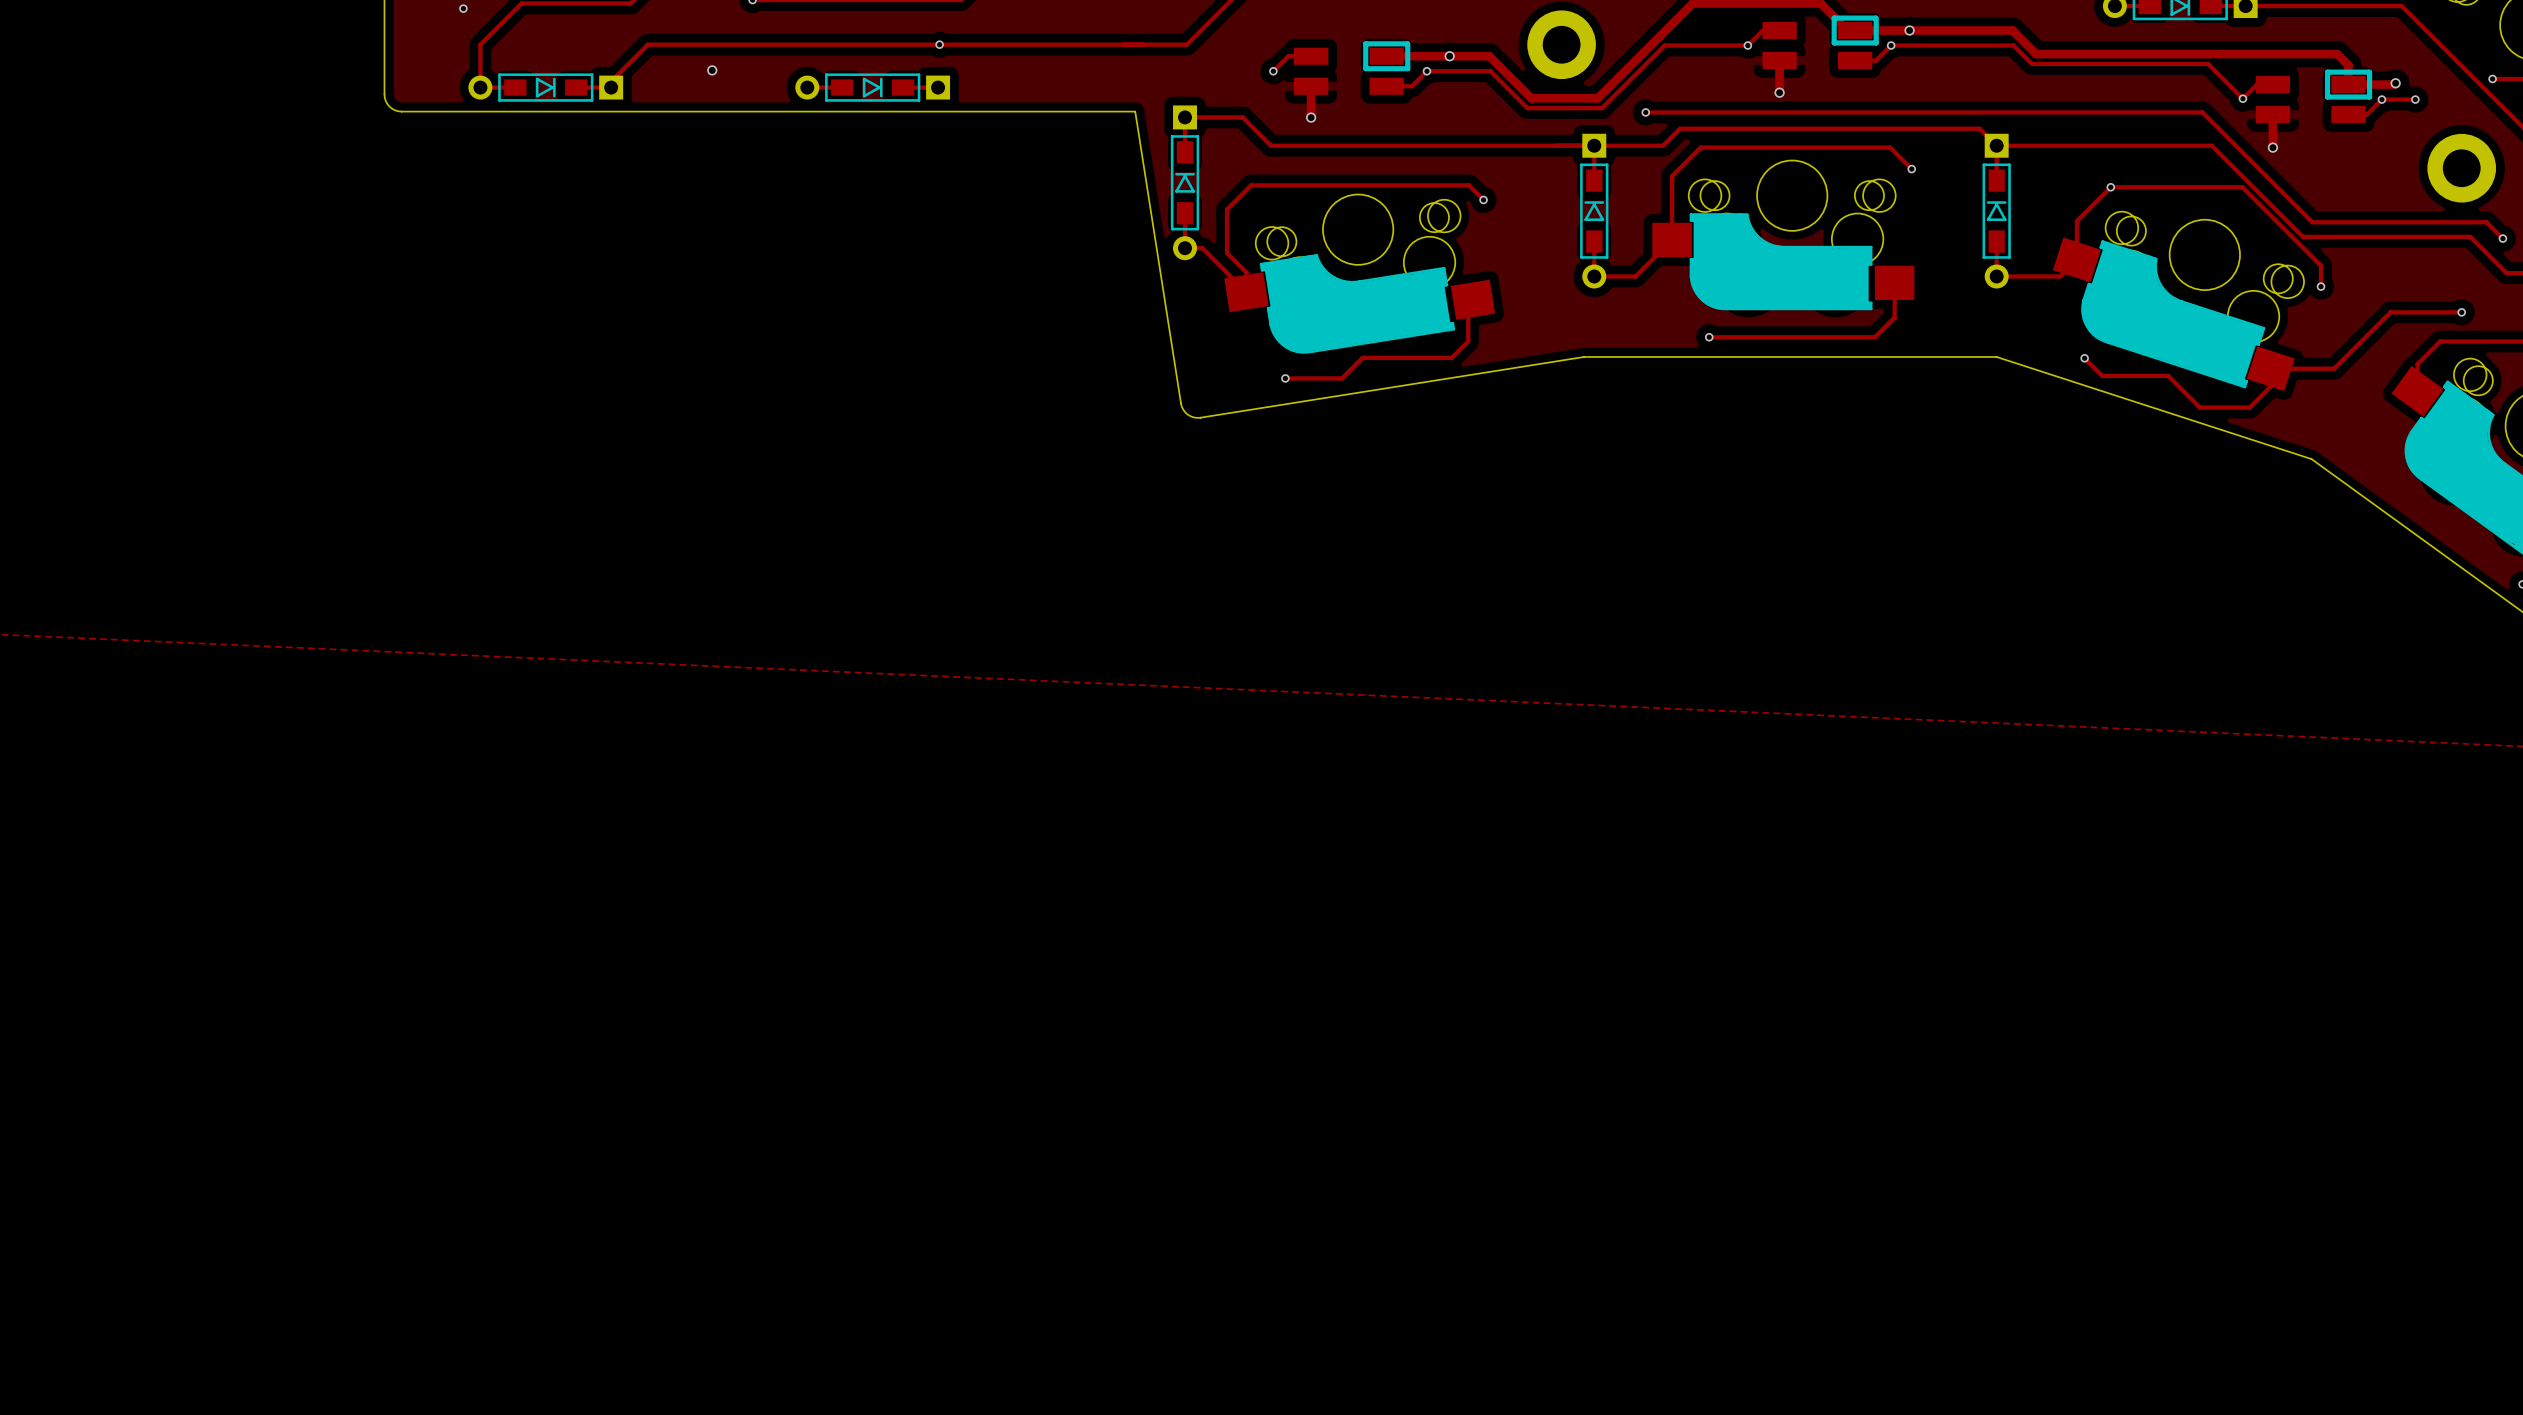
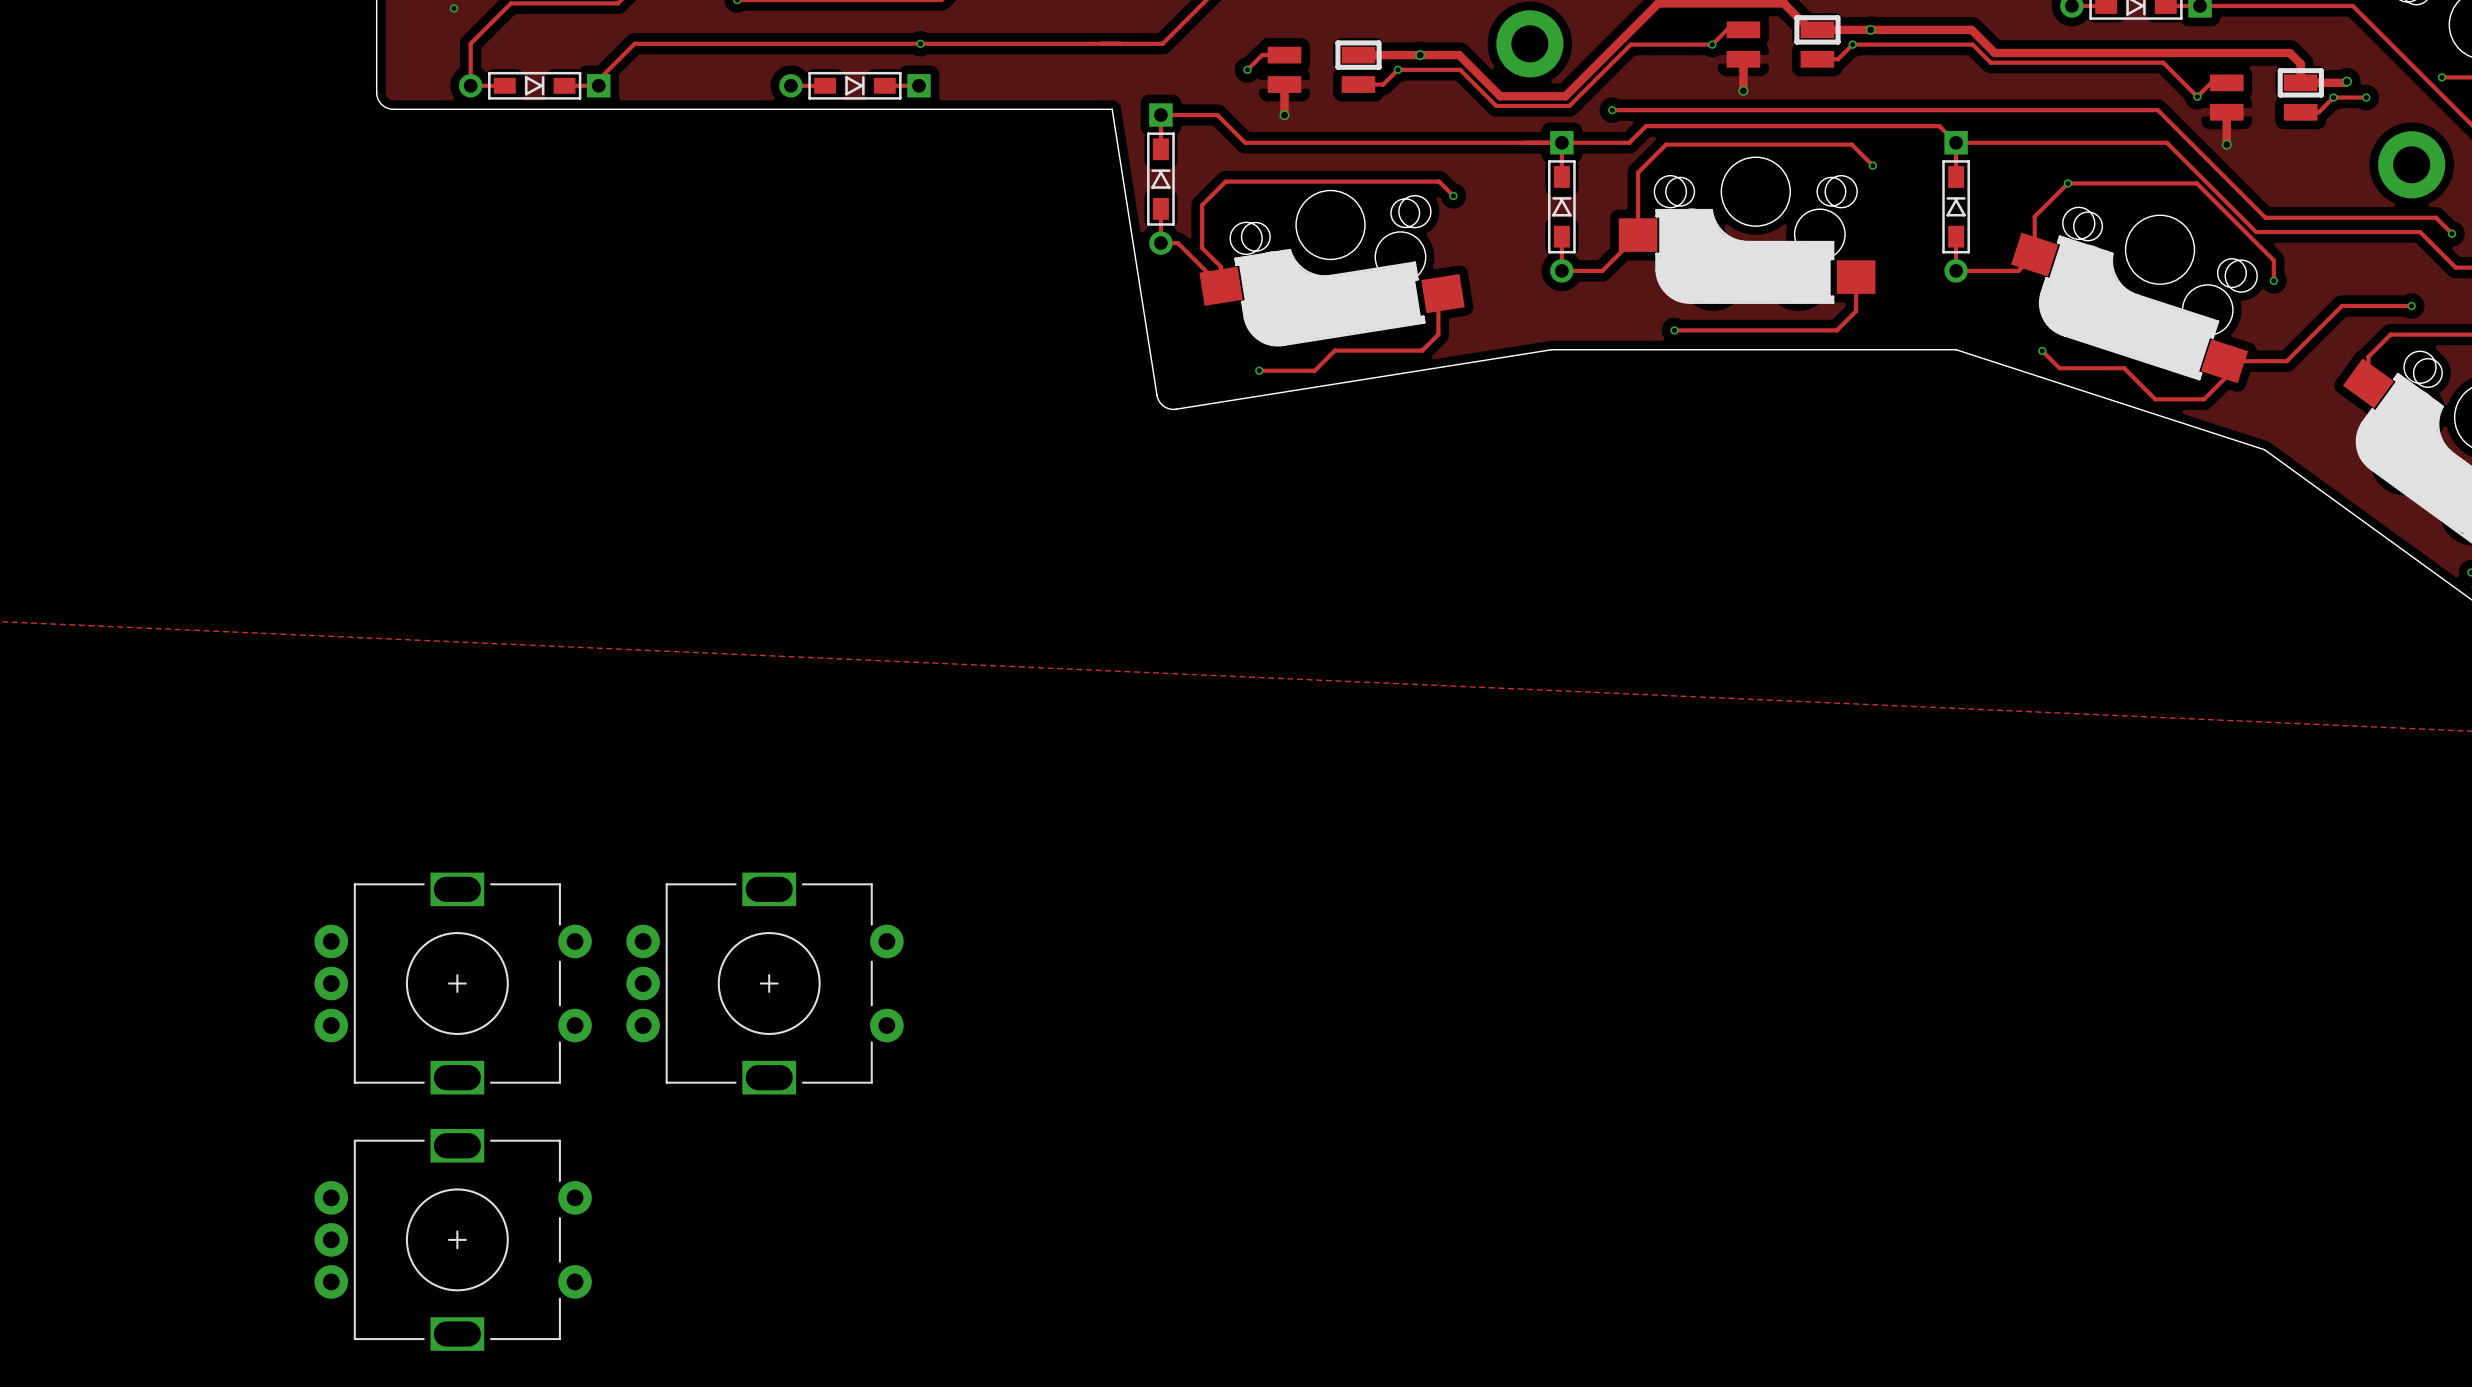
via: (712, 70) -> none
part: none -> (453, 983)
part: none -> (765, 983)
part: none -> (453, 1239)

